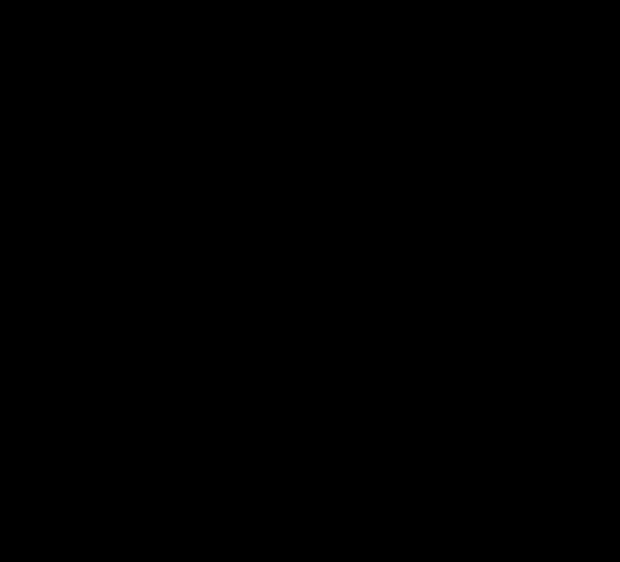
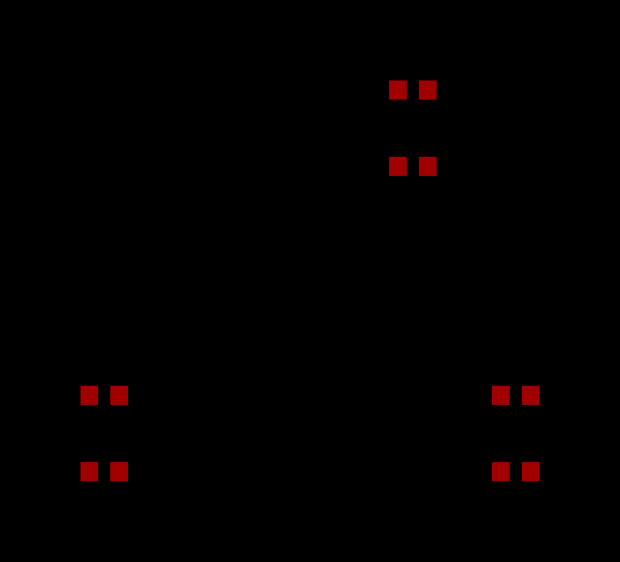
part: none -> (412, 90)
part: none -> (412, 166)
part: none -> (104, 395)
part: none -> (515, 395)
part: none -> (104, 471)
part: none -> (515, 471)

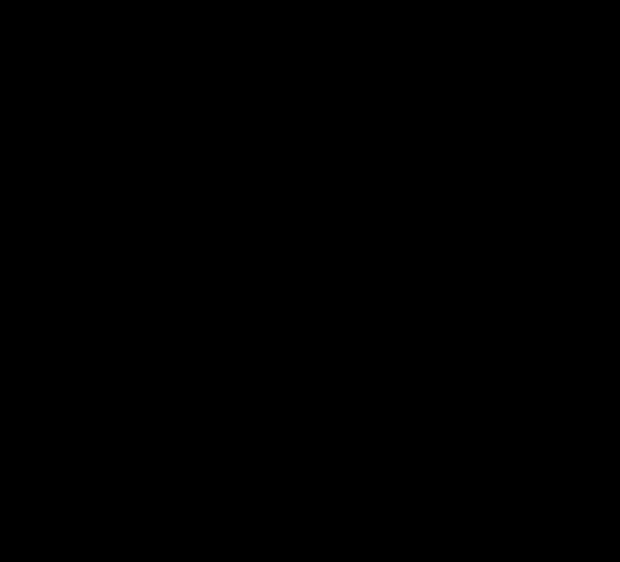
part: (412, 90) -> none
part: (412, 166) -> none
part: (104, 395) -> none
part: (515, 395) -> none
part: (104, 471) -> none
part: (515, 471) -> none

